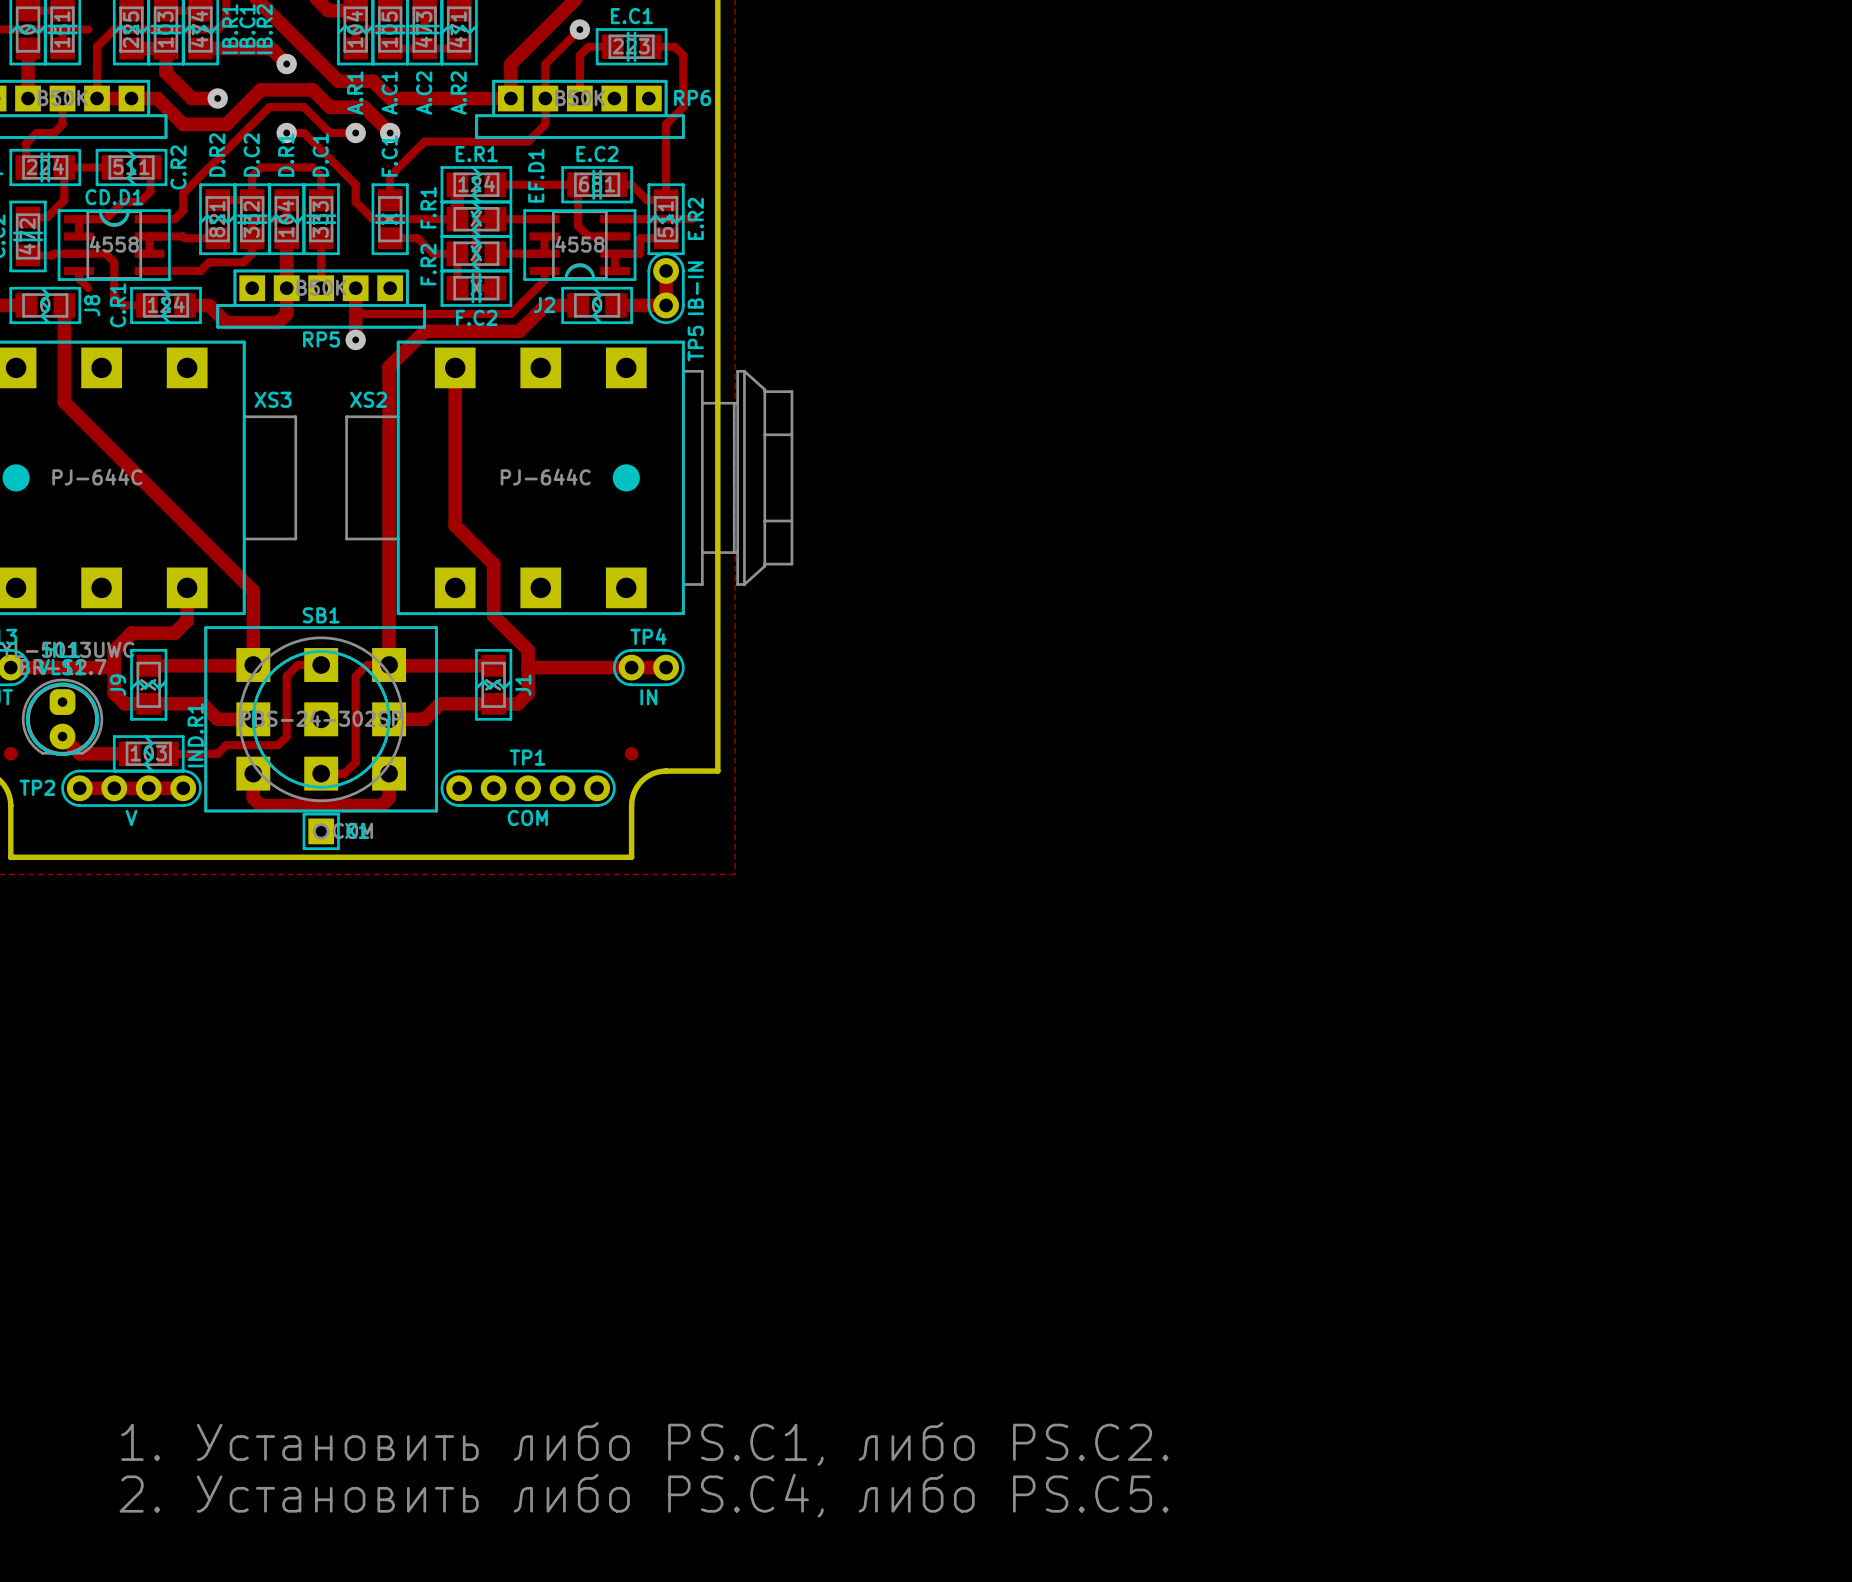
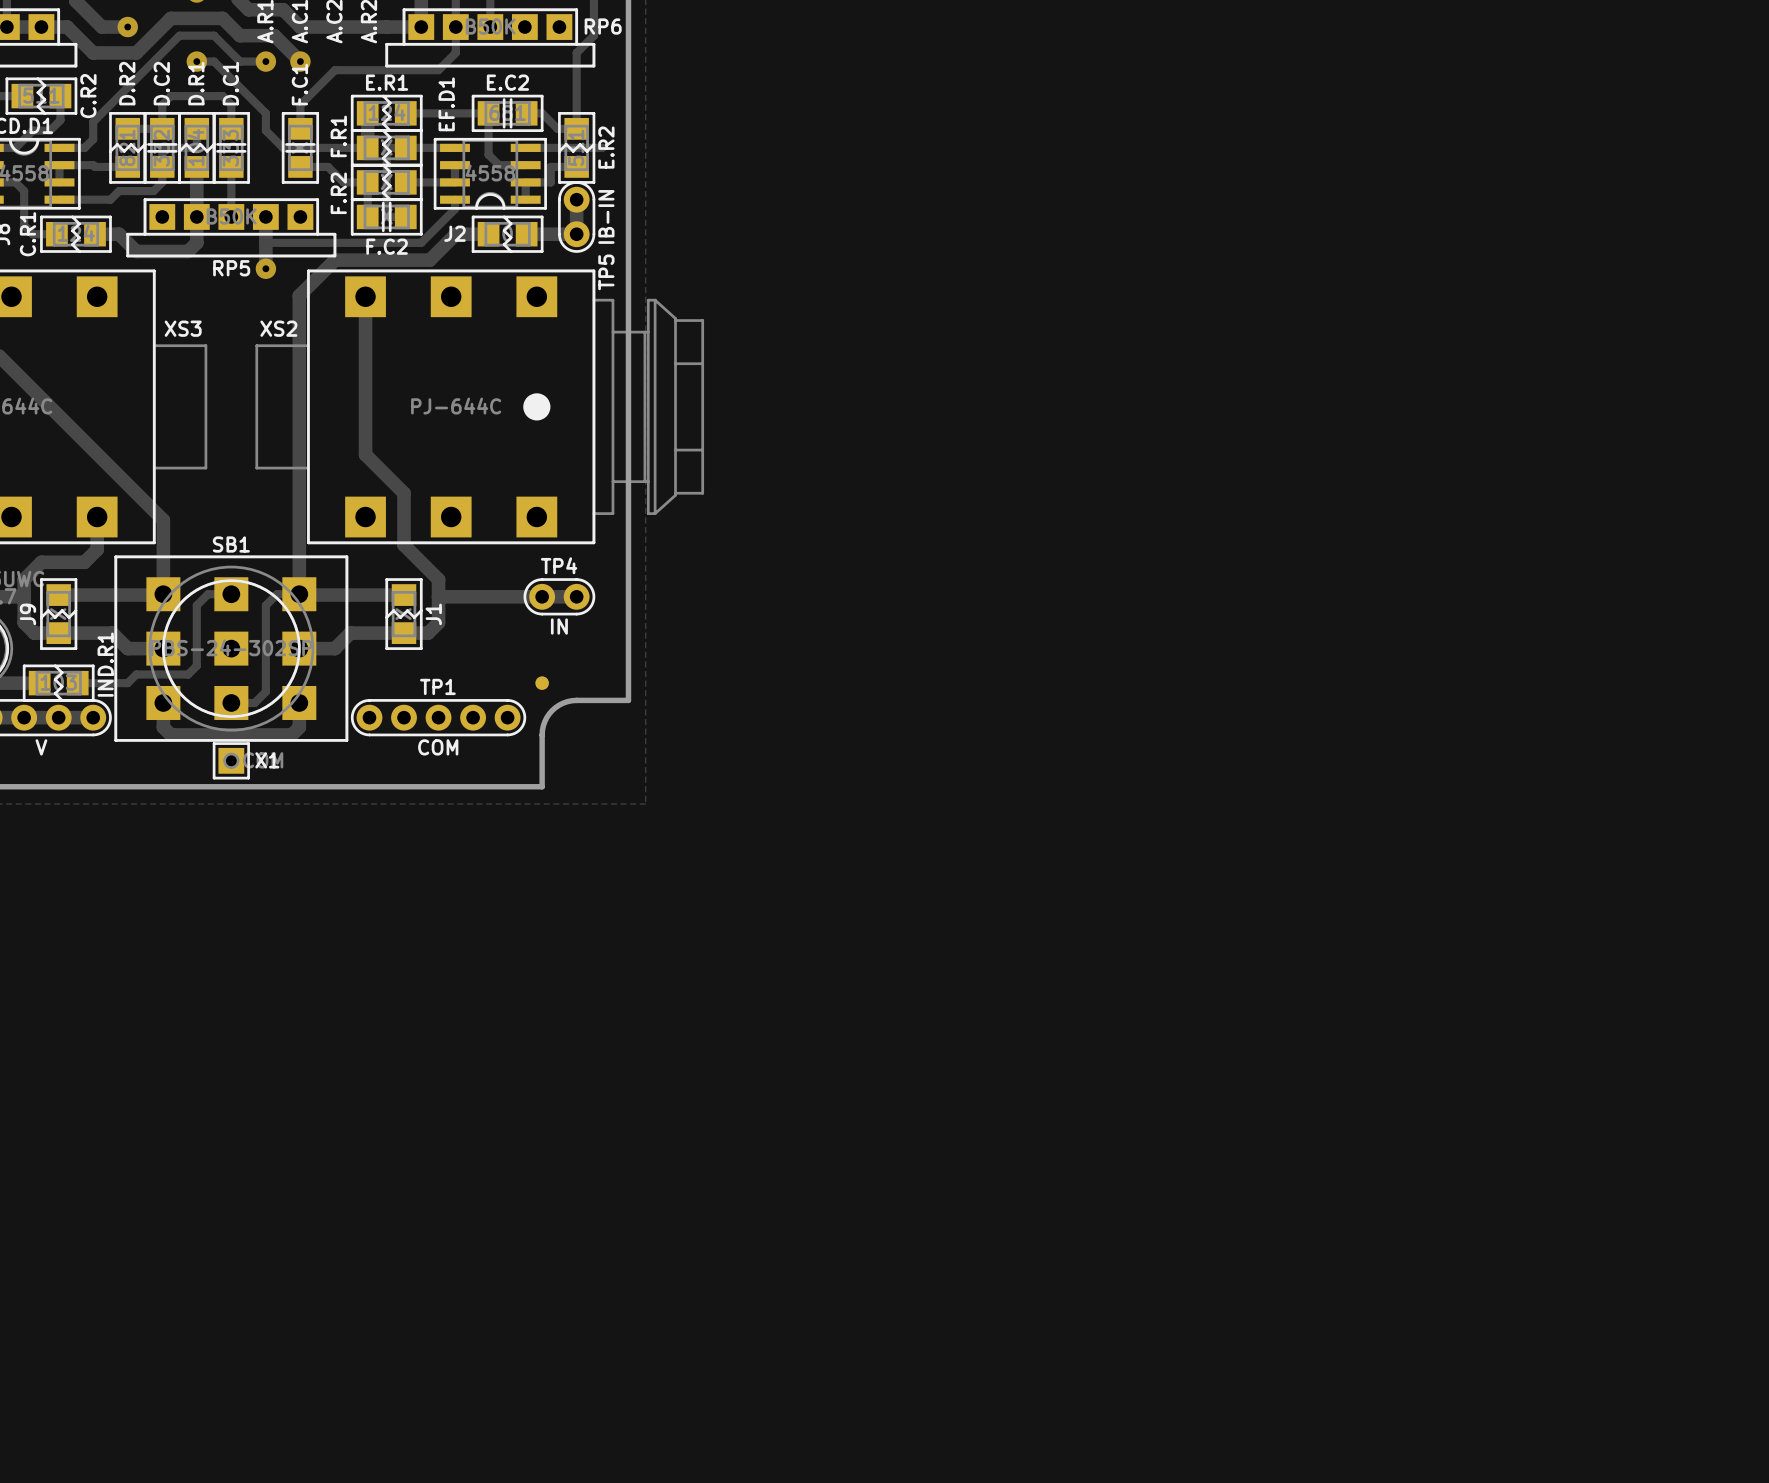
text: 1. Установить либо PS.C1, либо PS.C2. (644, 1443) -> none
text: 2. Установить либо PS.C4, либо PS.C5. (644, 1495) -> none

